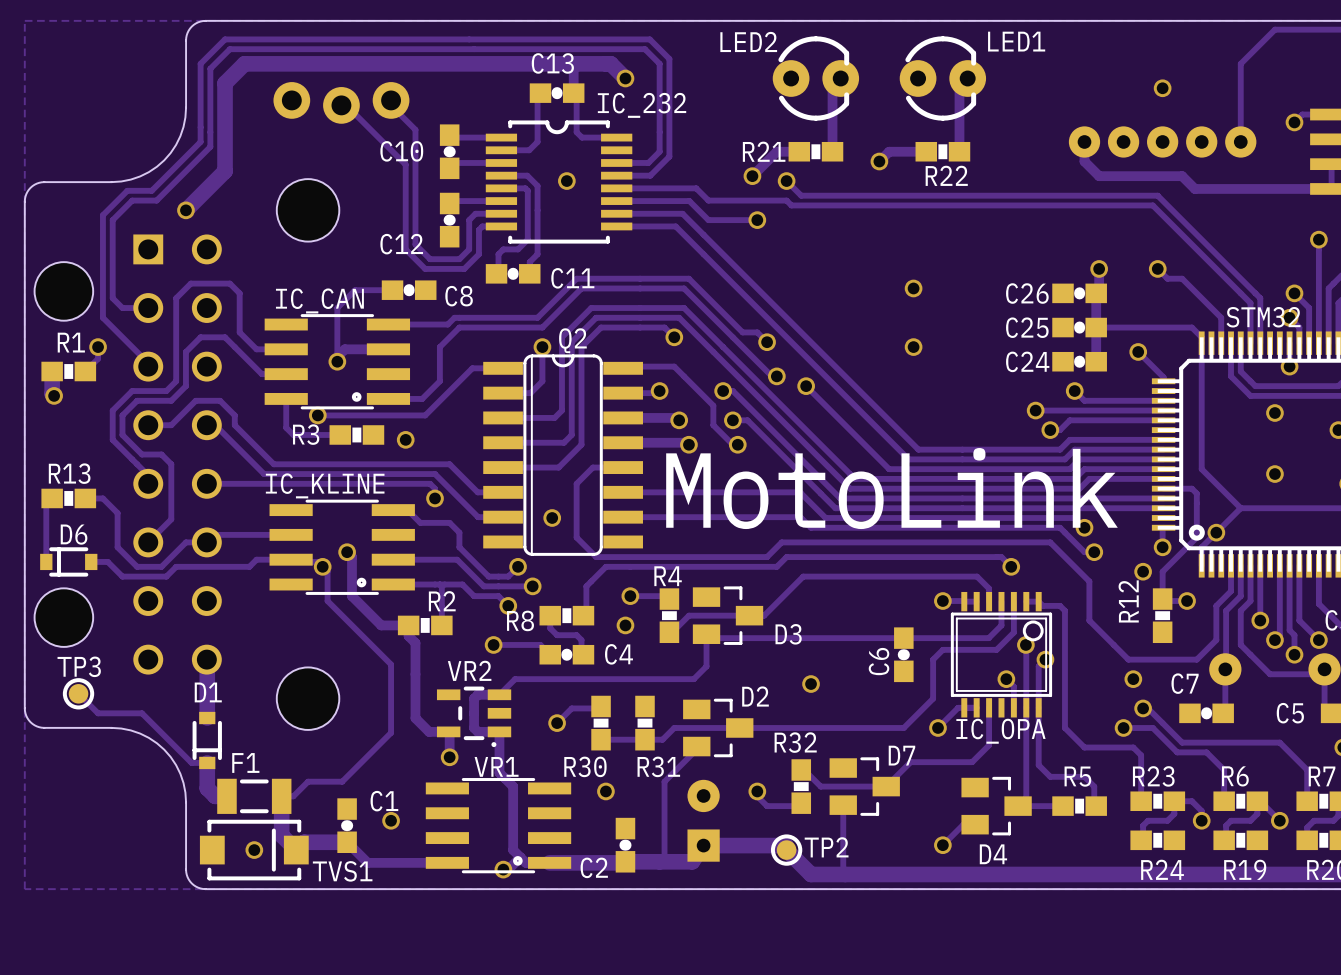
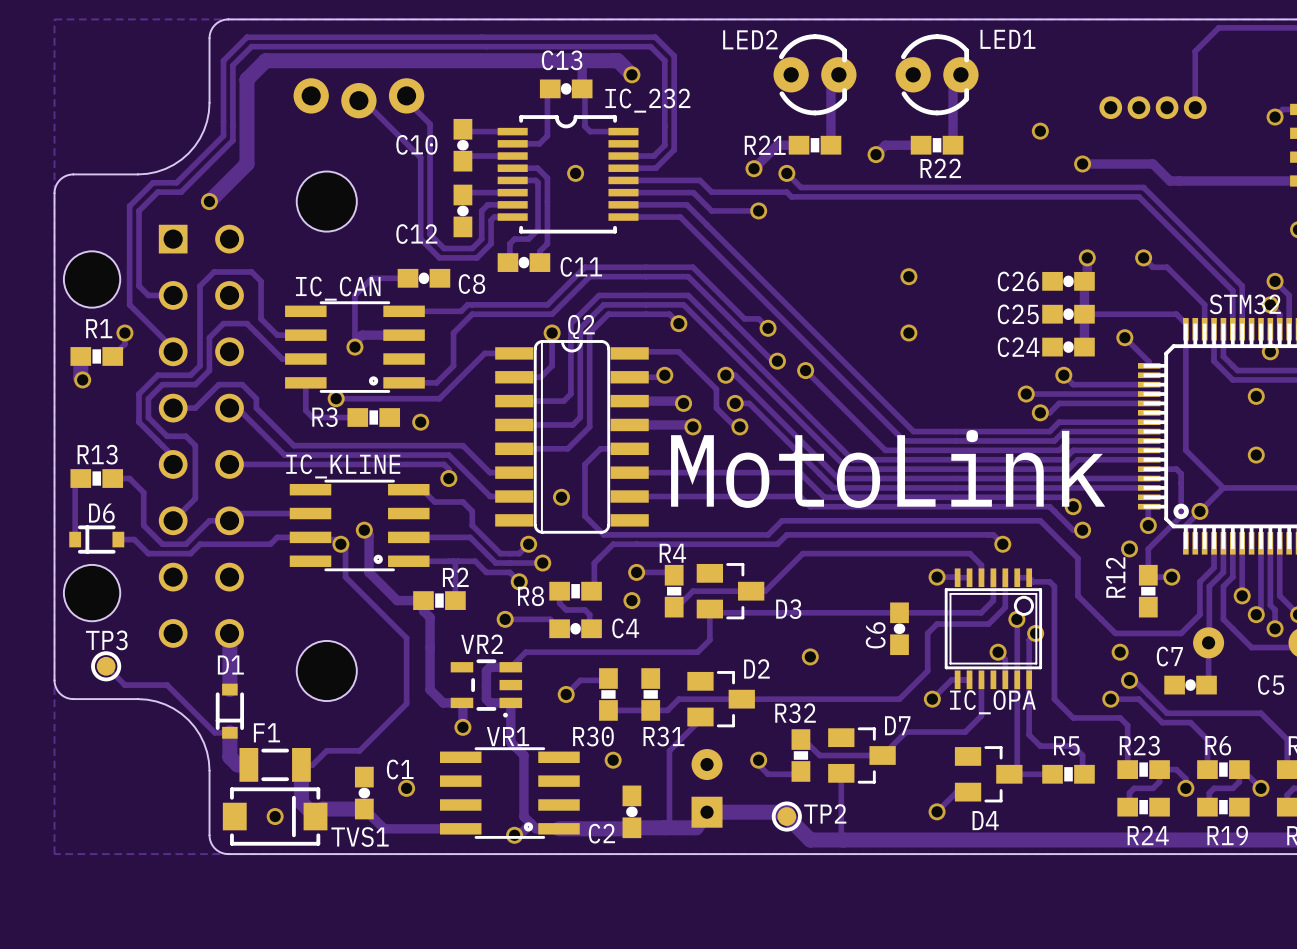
track: (1274, 29) (1240, 63) (1240, 141) -> (1256, 27) (1218, 27) (1195, 51) (1195, 107)
via: (1162, 88) -> none
part: none -> (1153, 107)
via: none -> (1040, 131)
track: (1084, 141) (1084, 161) (1099, 176) (1182, 176) (1194, 188) -> (1082, 164) (1153, 164) (1170, 180) (1179, 180)
part: (1162, 141) -> none
via: none -> (1082, 164)

